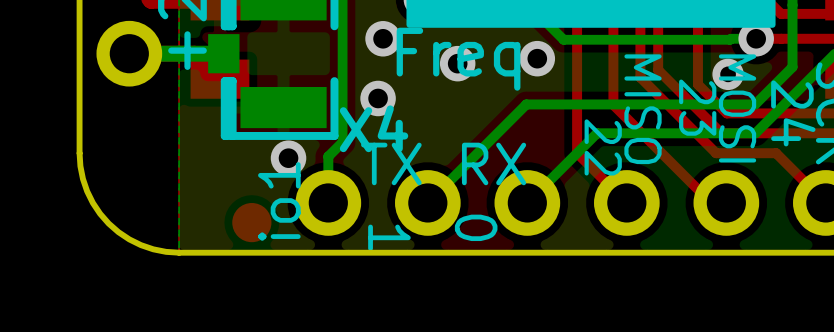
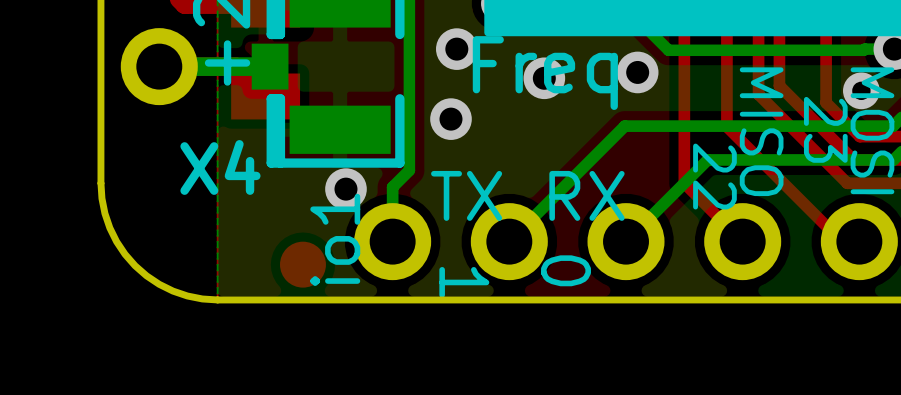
X4 name position: X4 (374, 128) -> X4 (220, 167)

